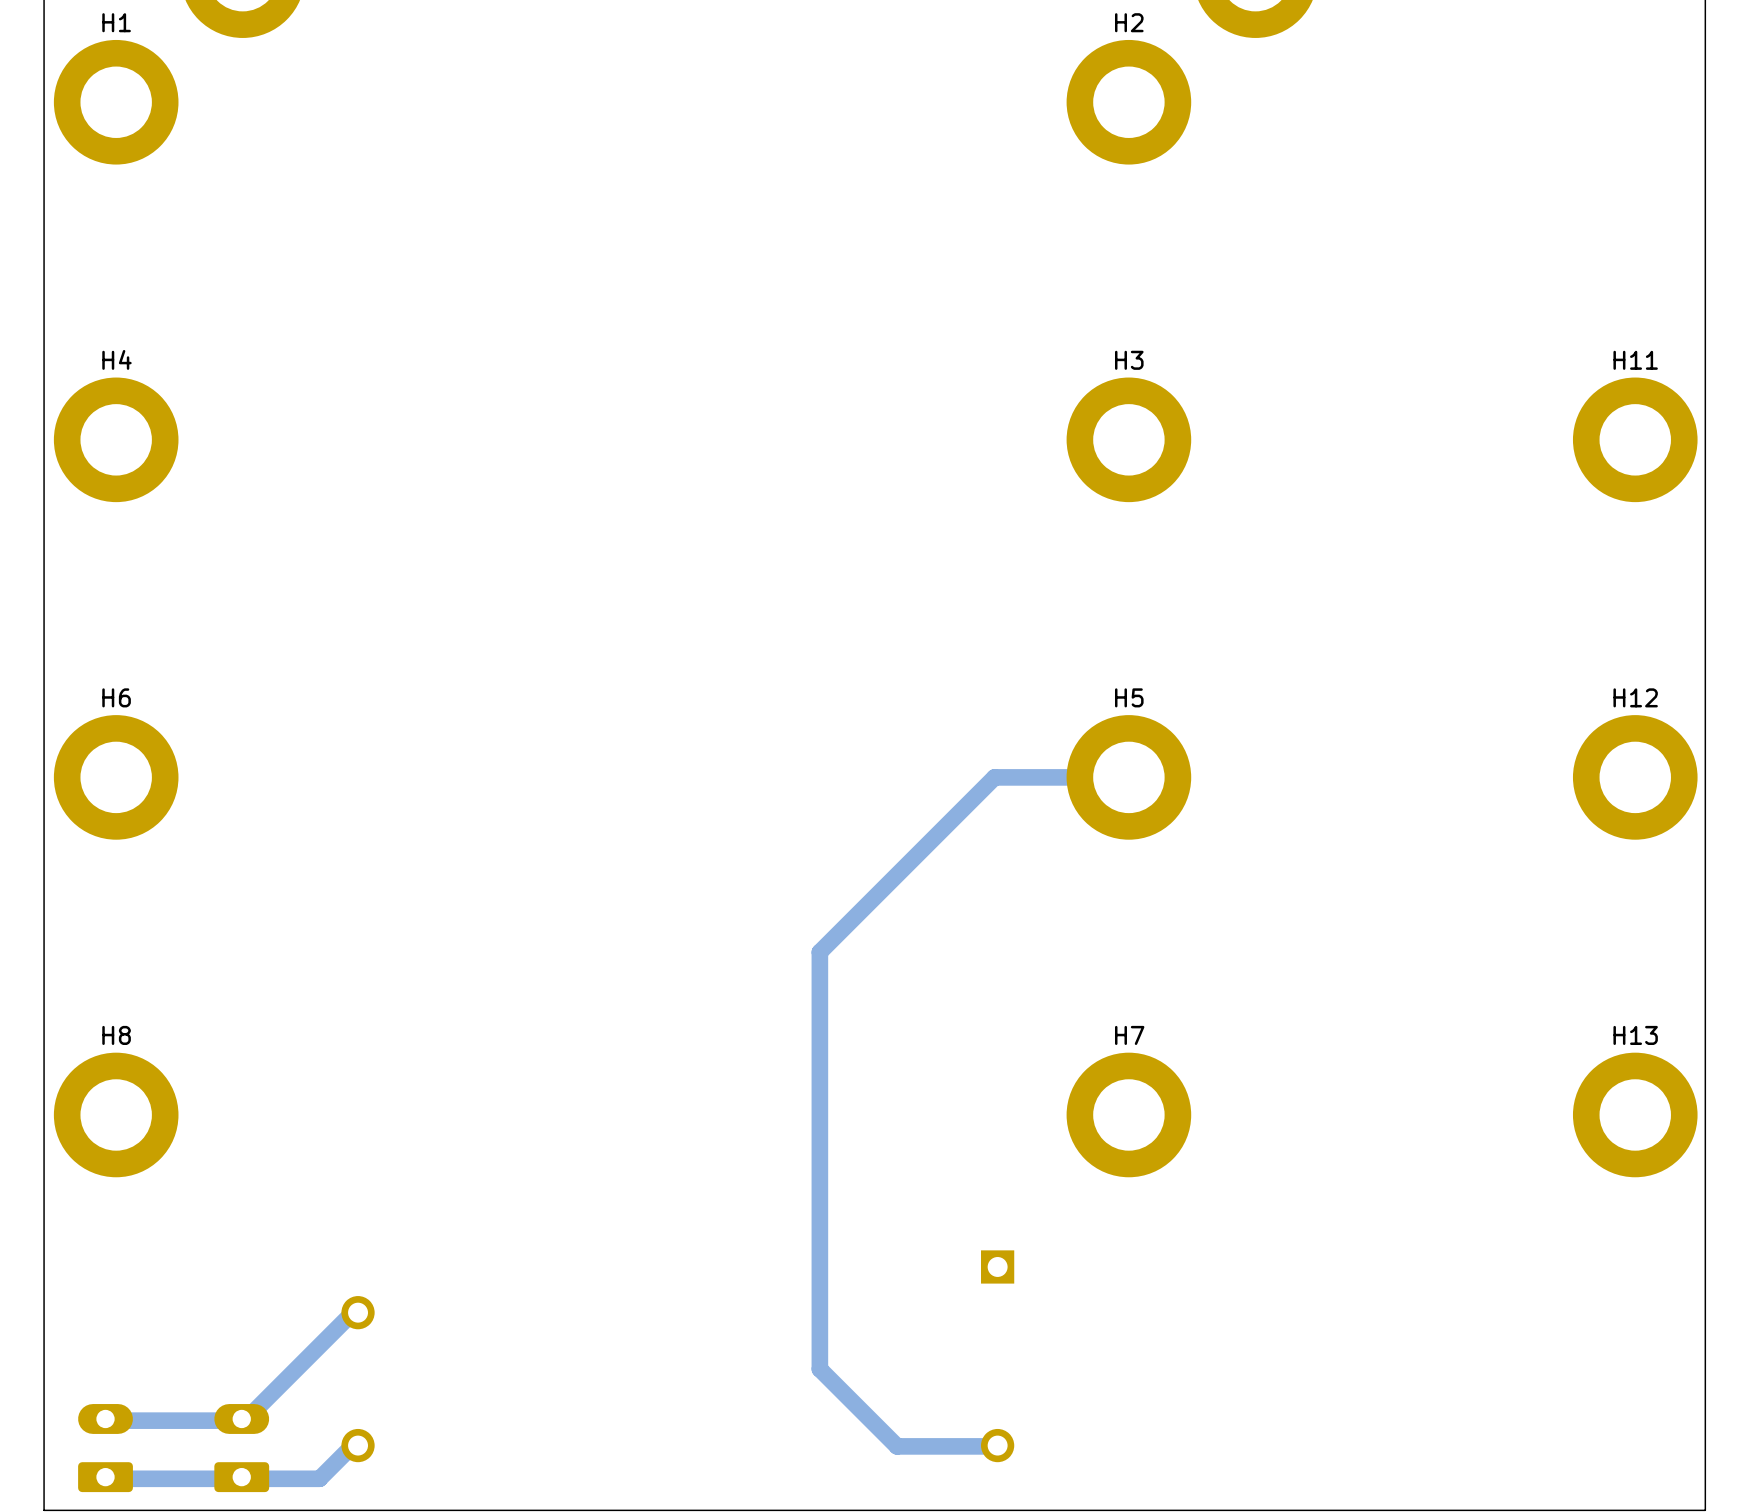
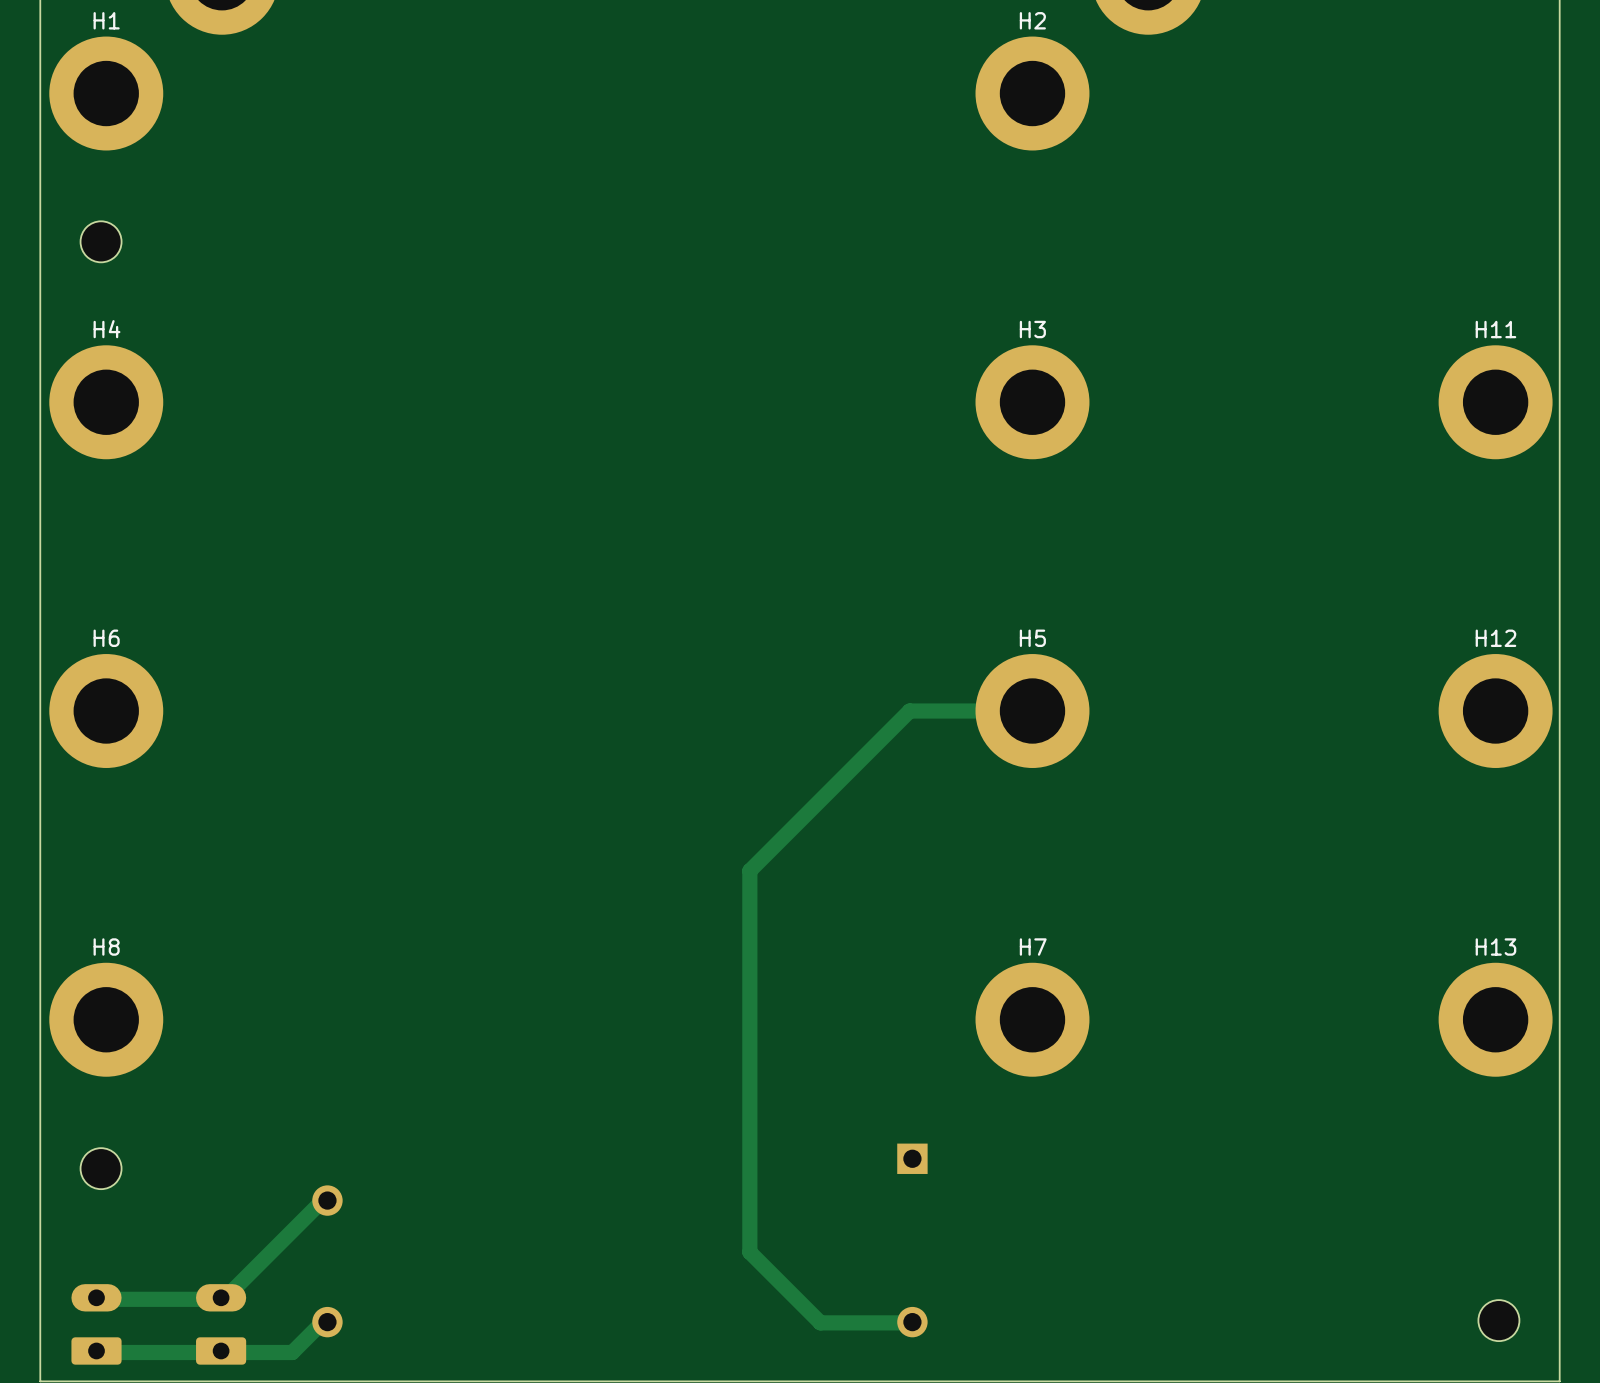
part: none -> (101, 241)
part: none -> (101, 1168)
part: none -> (1498, 1320)

